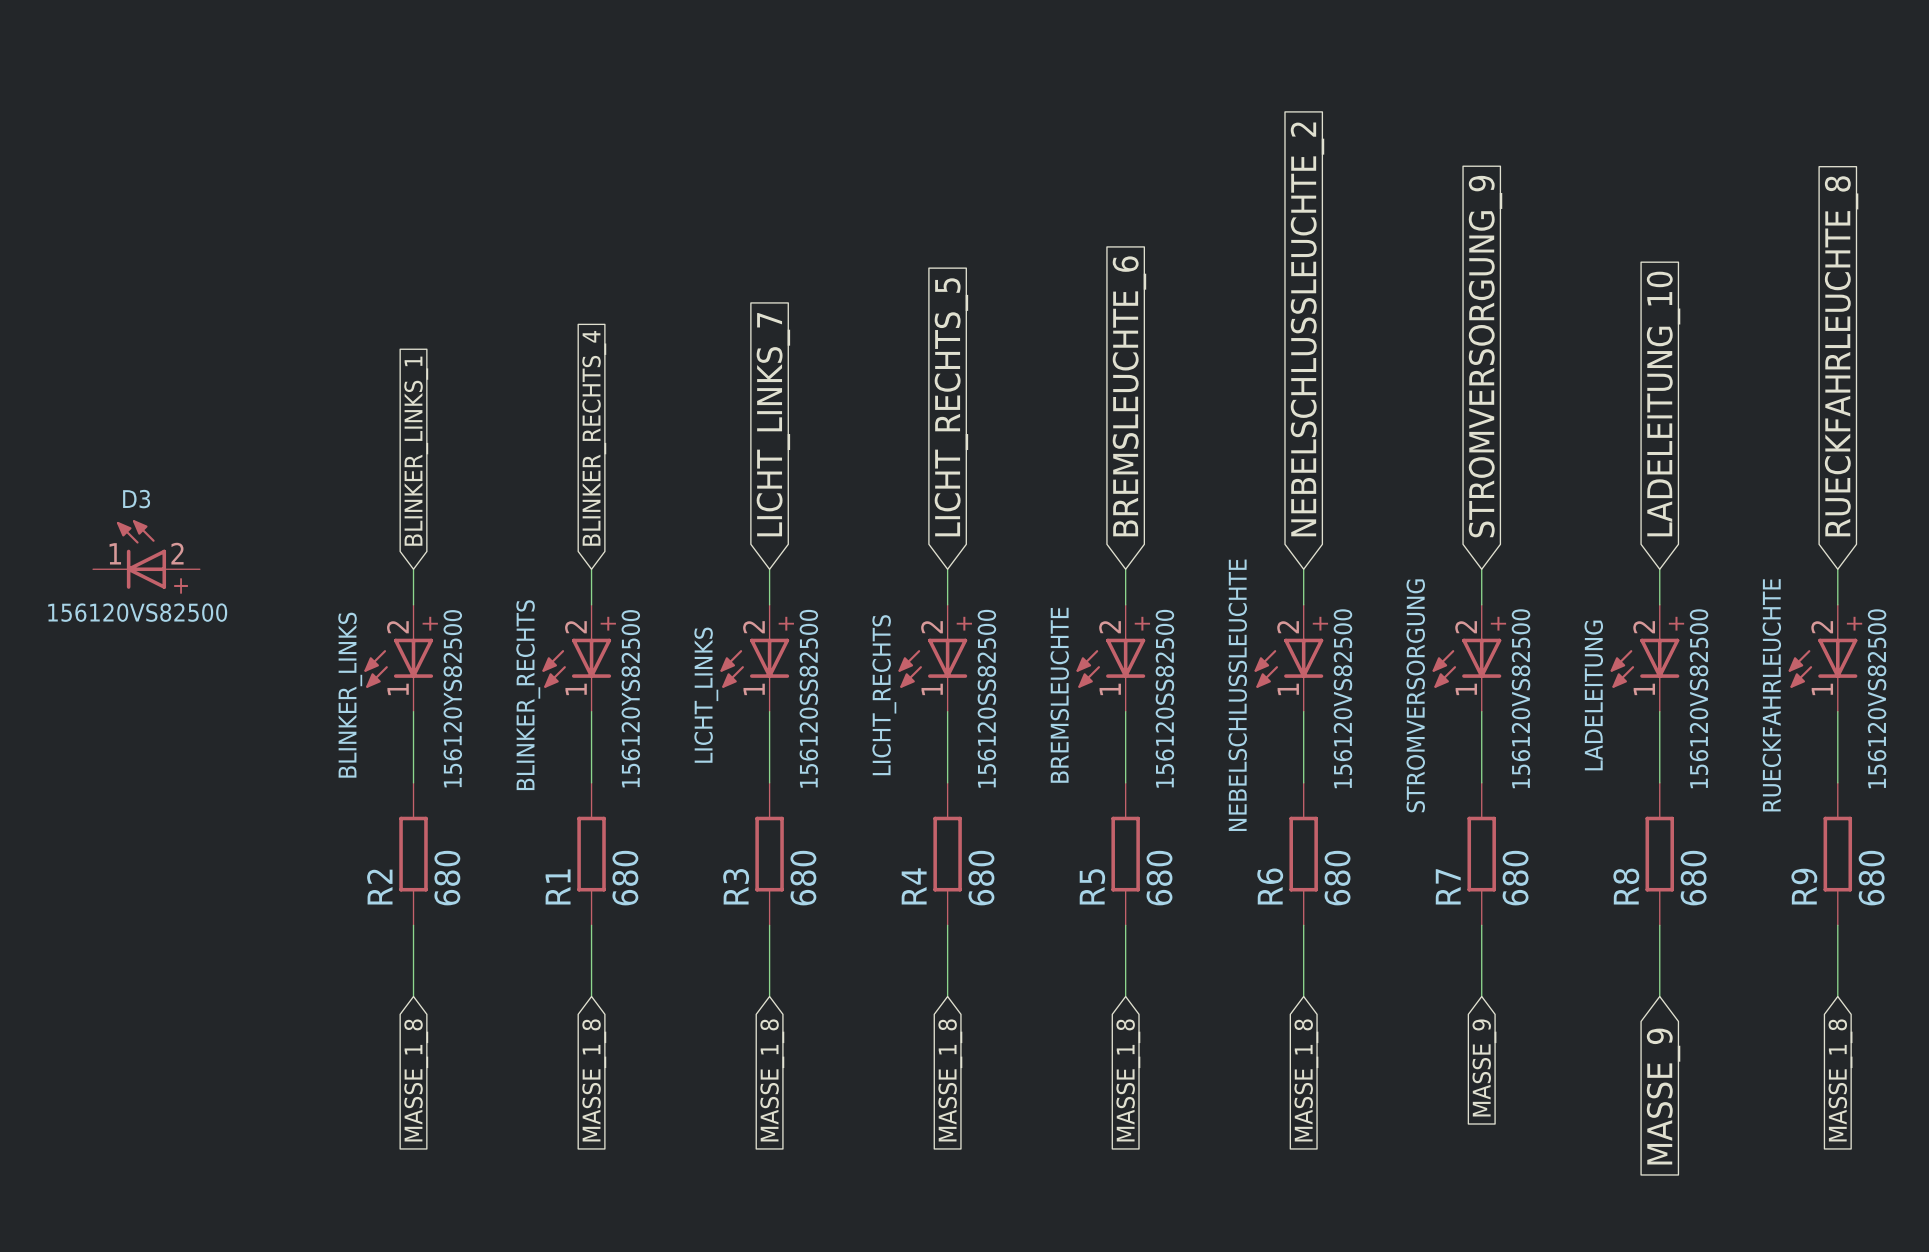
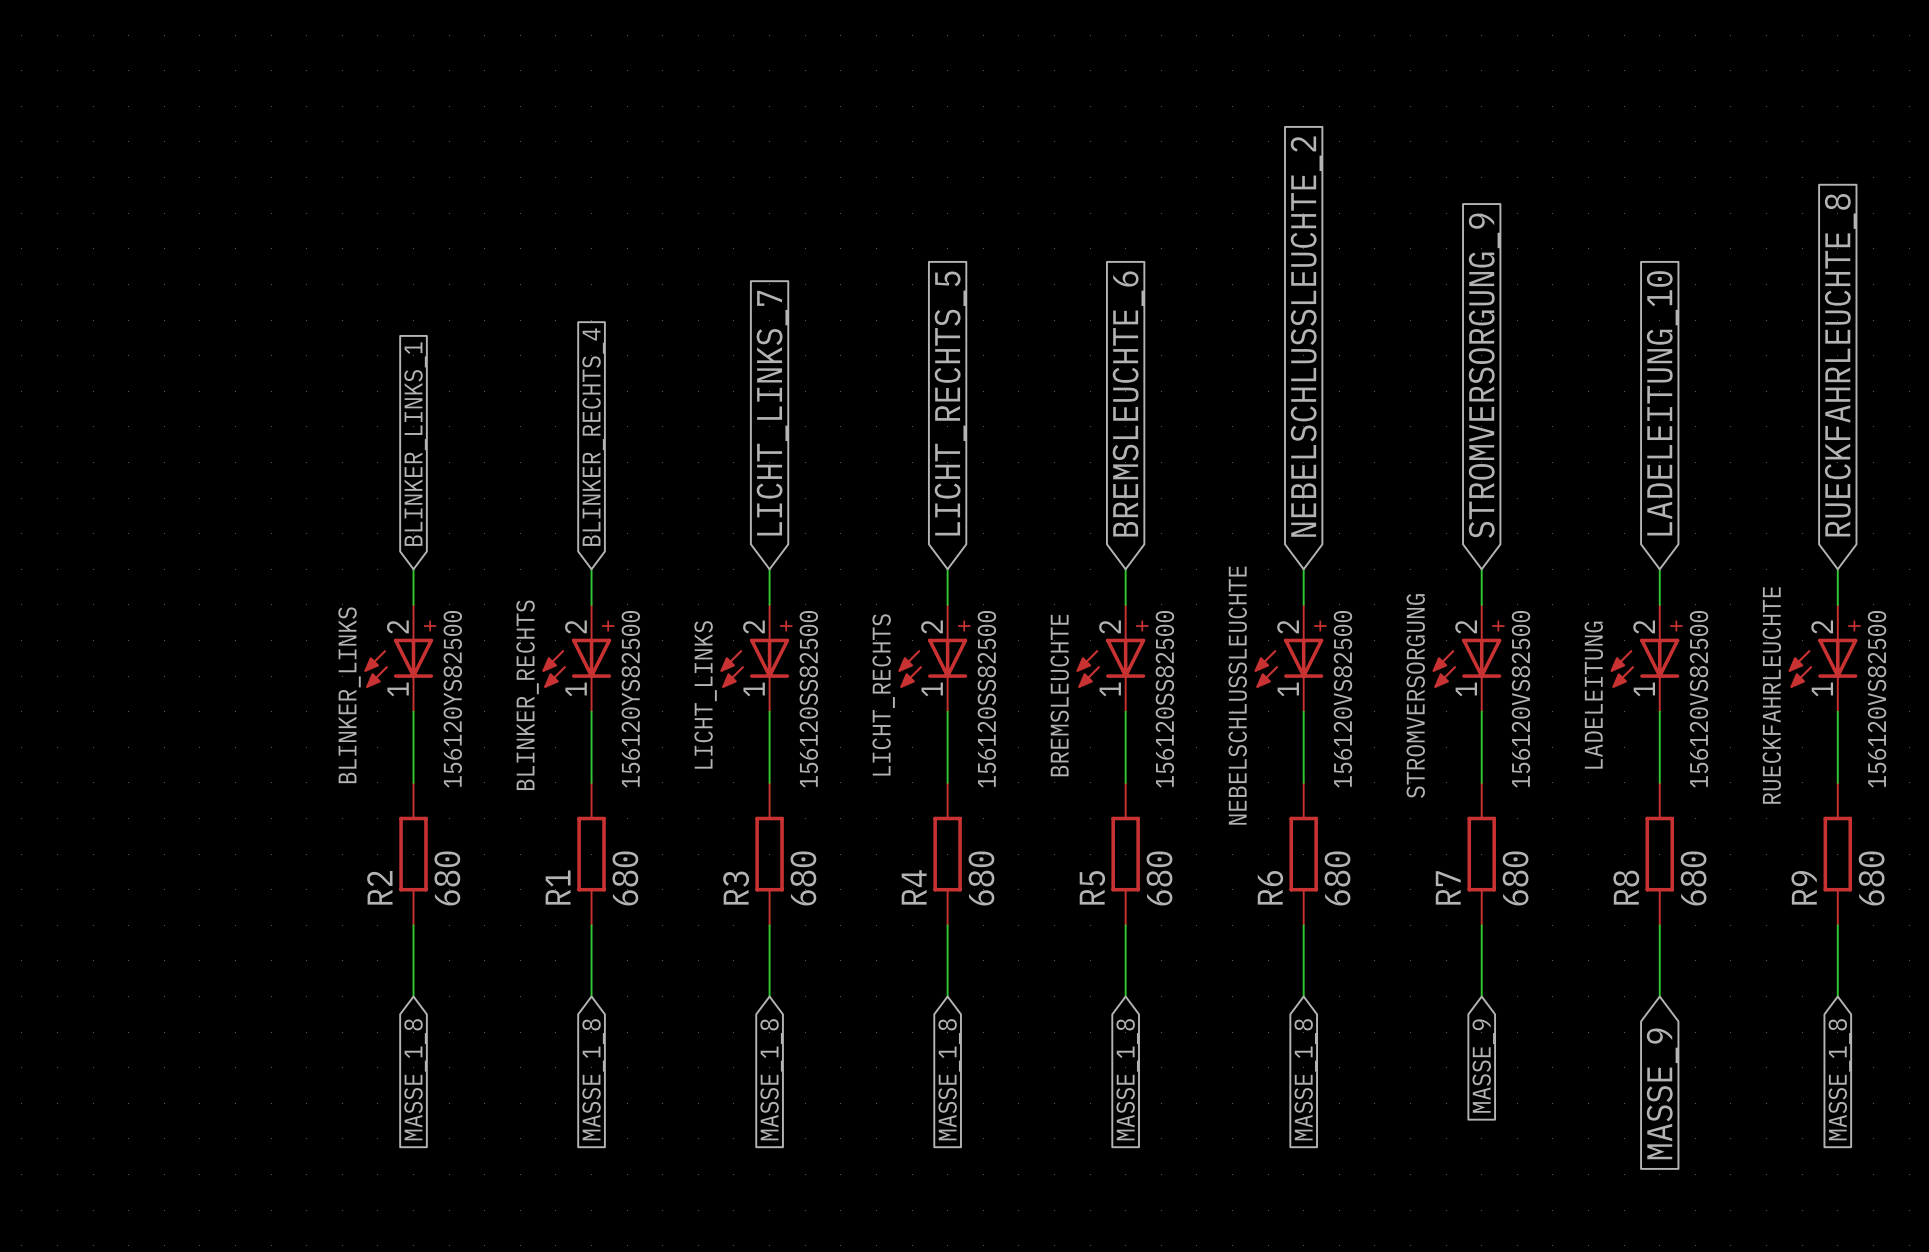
D3: 156120VS82500 (146, 554) -> none

